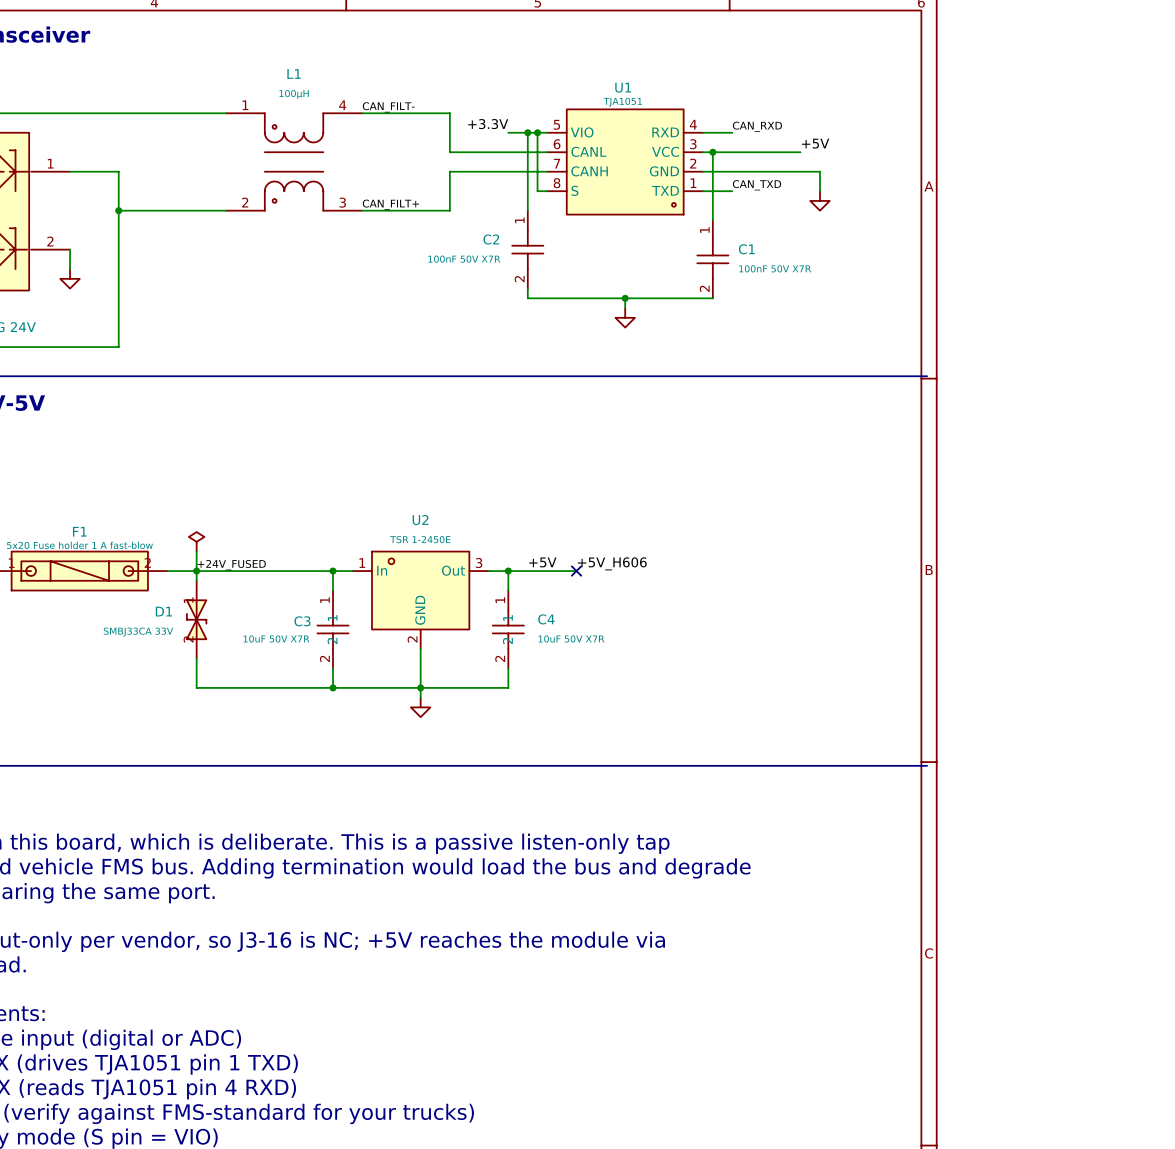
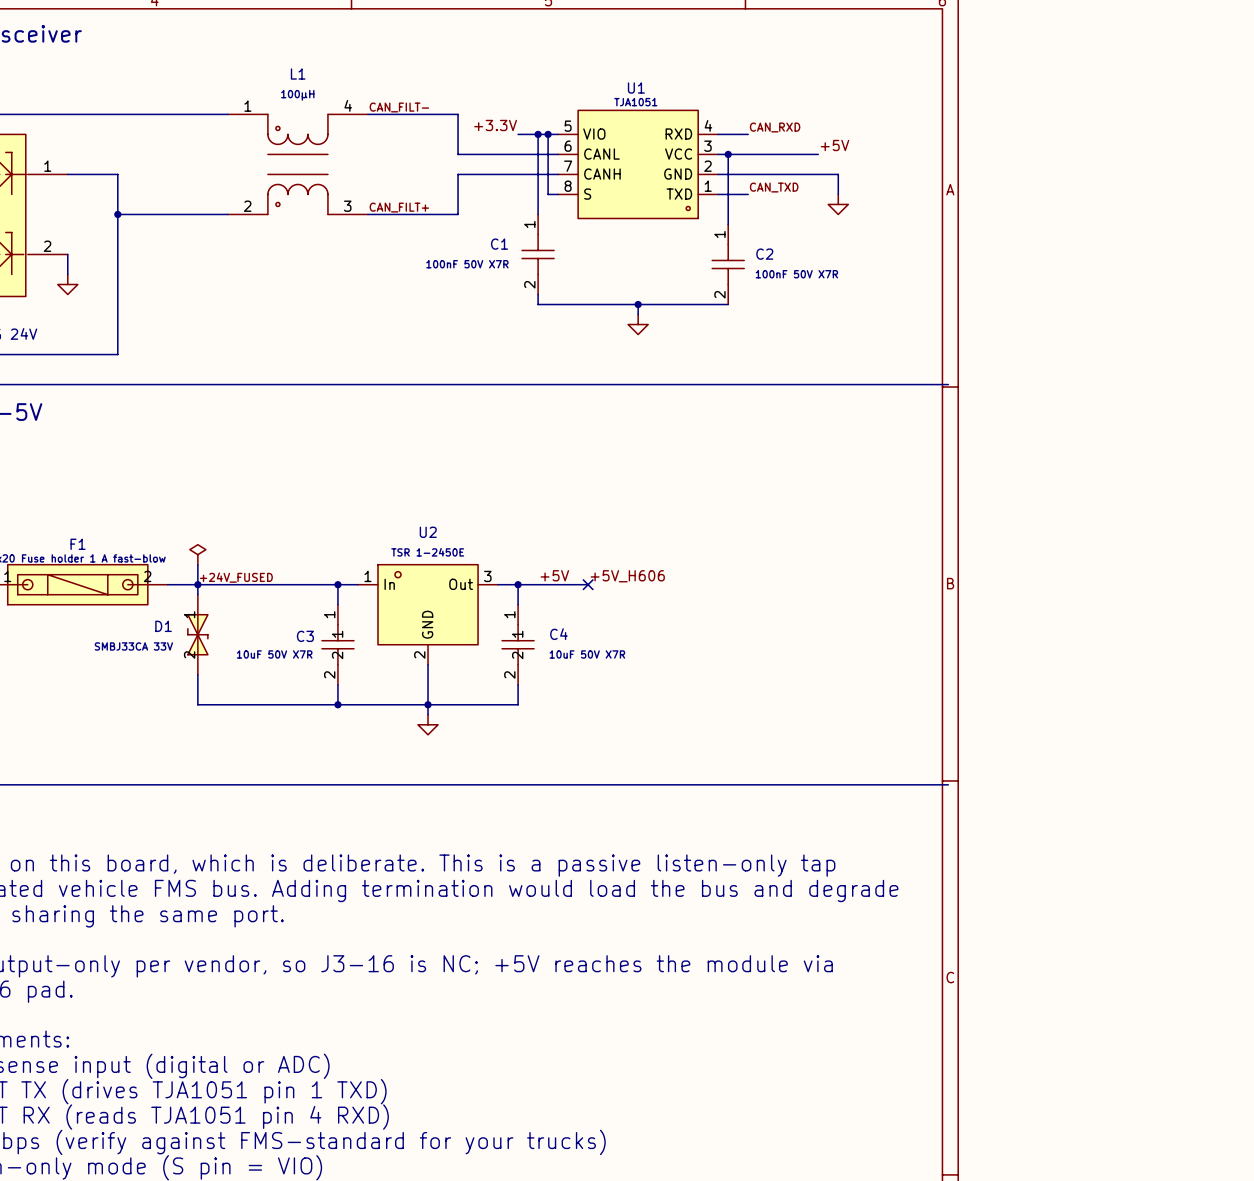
C2 name: C2 (491, 239) -> C1 (499, 244)
C1 name: C1 (746, 249) -> C2 (764, 254)

